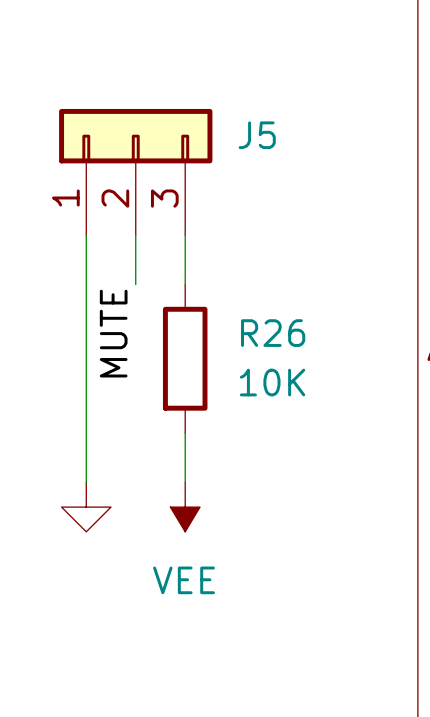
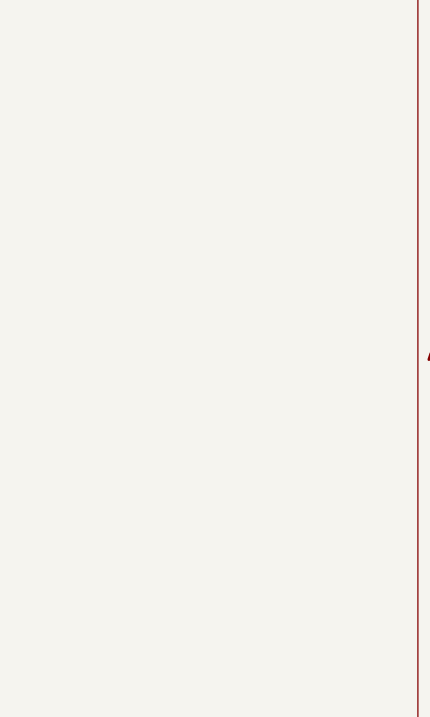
J5: (135, 172) -> none
wire: (86, 235) (86, 482) -> none
wire: (135, 235) (135, 284) -> none
wire: (185, 235) (185, 284) -> none
label: MUTE (113, 333) -> none
R26: 10K (185, 358) -> none
wire: (185, 432) (185, 482) -> none
power symbol: (86, 507) -> none
power symbol: VEE (185, 507) -> none

